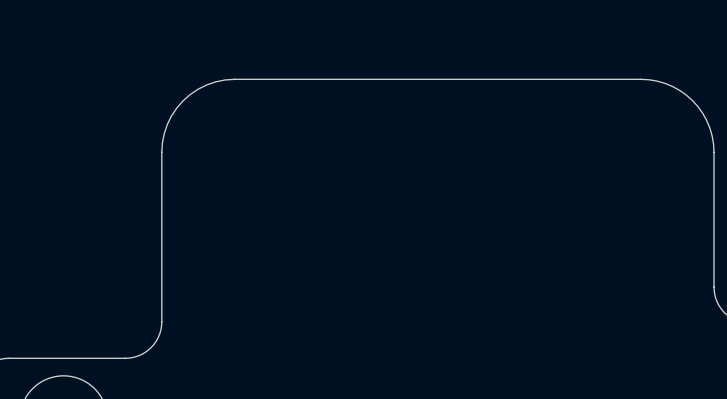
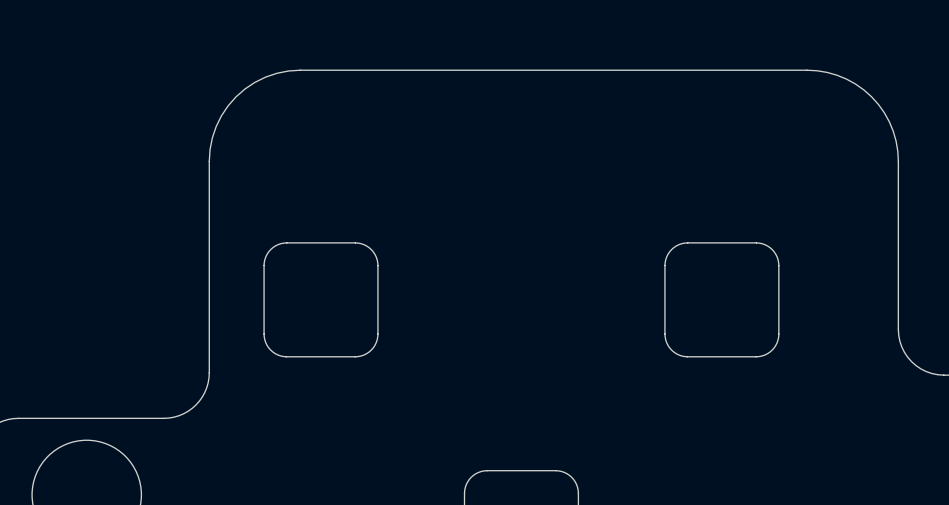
board edge: none -> (355, 242) (283, 243) (275, 245) (268, 251) (264, 265) (264, 334) (265, 342) (272, 351) (286, 356) (355, 356) (363, 355) (373, 347) (377, 334) (377, 262) (371, 249) (364, 244) (355, 242)
board edge: none -> (756, 242) (684, 243) (676, 245) (669, 251) (664, 265) (664, 334) (667, 345) (673, 351) (687, 356) (756, 356) (764, 355) (774, 347) (778, 334) (778, 262) (772, 249) (764, 244) (756, 242)

